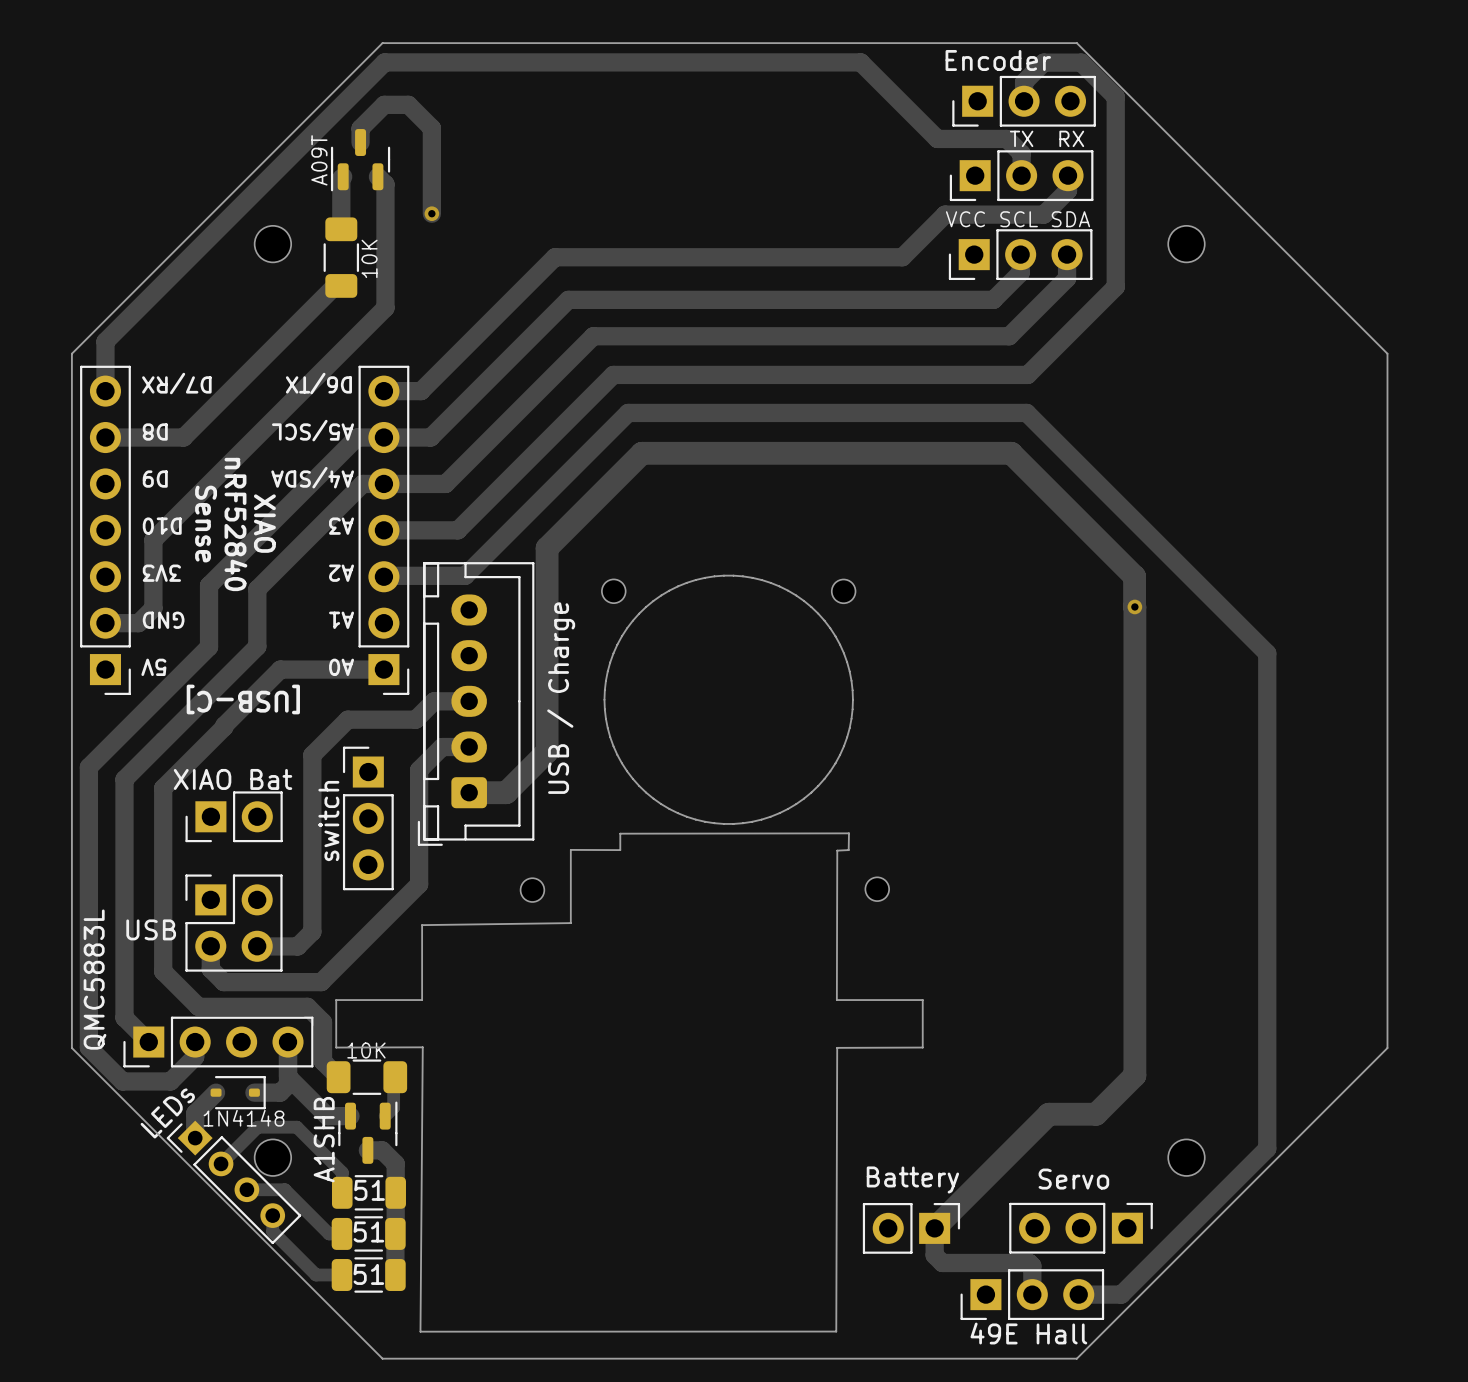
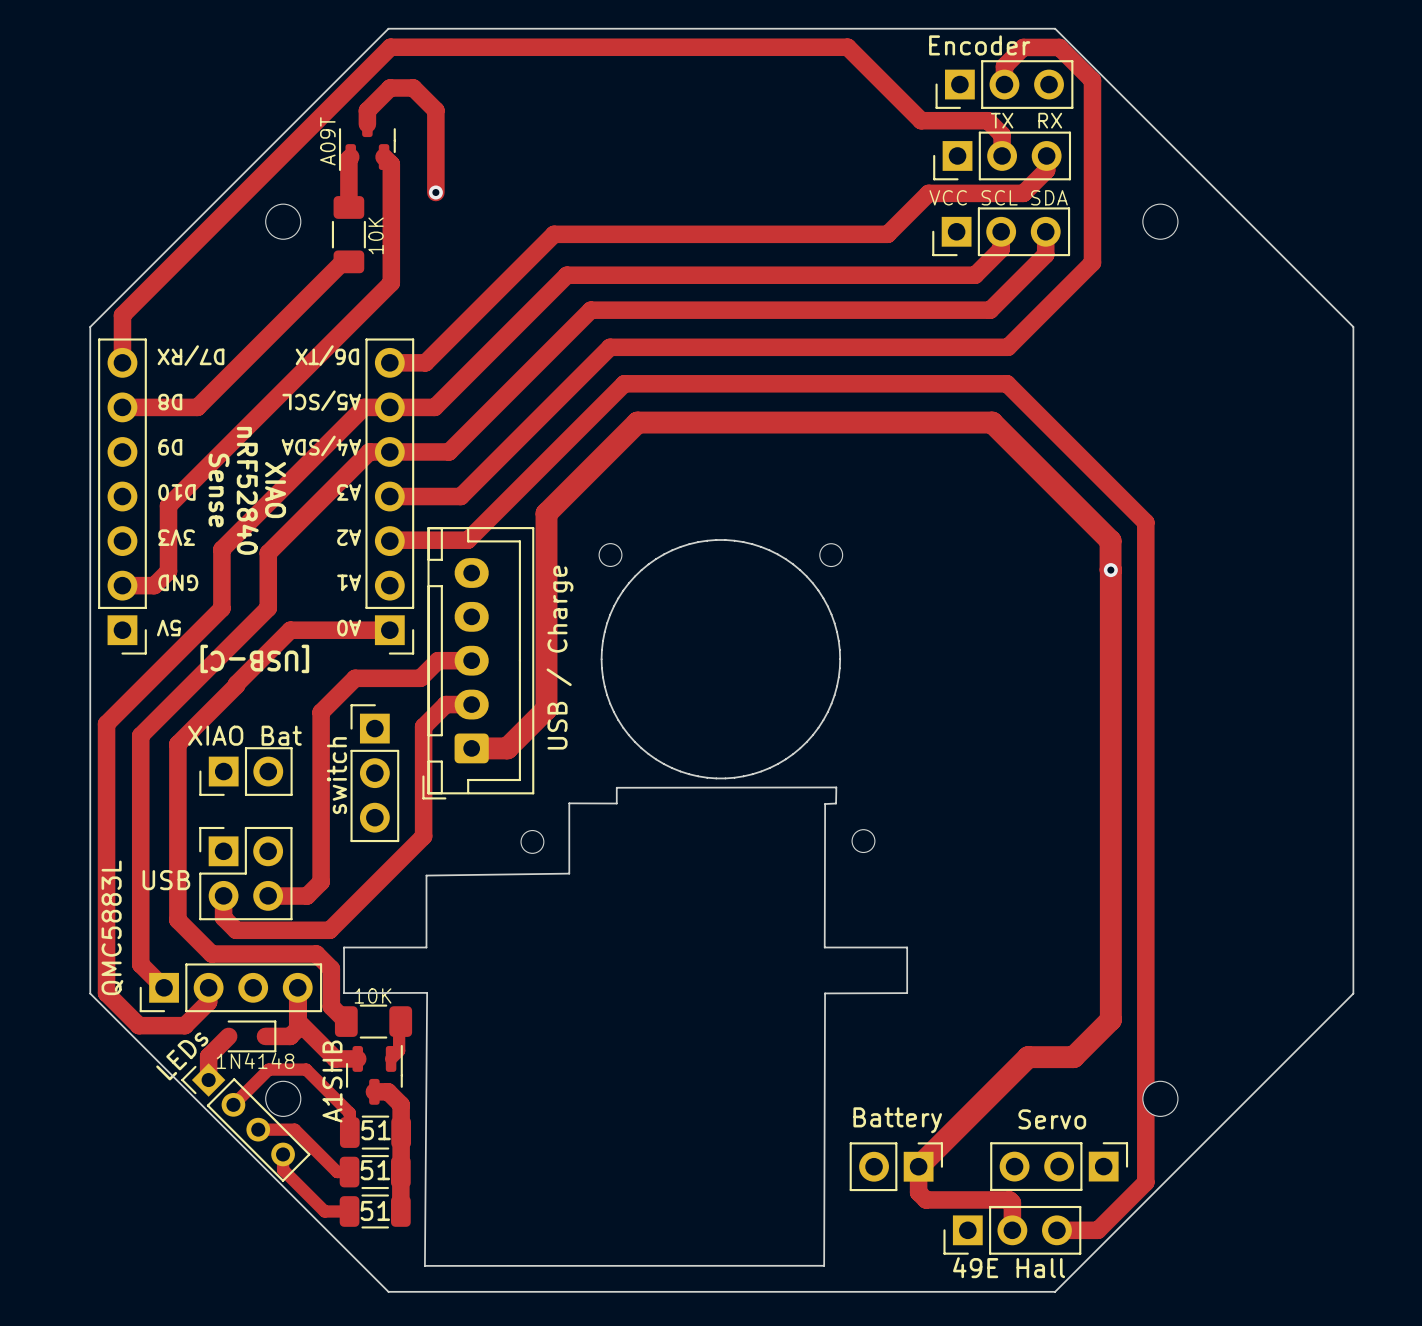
track: (1171, 557) (1267, 653) (1267, 1148) (1171, 1244) -> (1145, 522) (1145, 1182)

